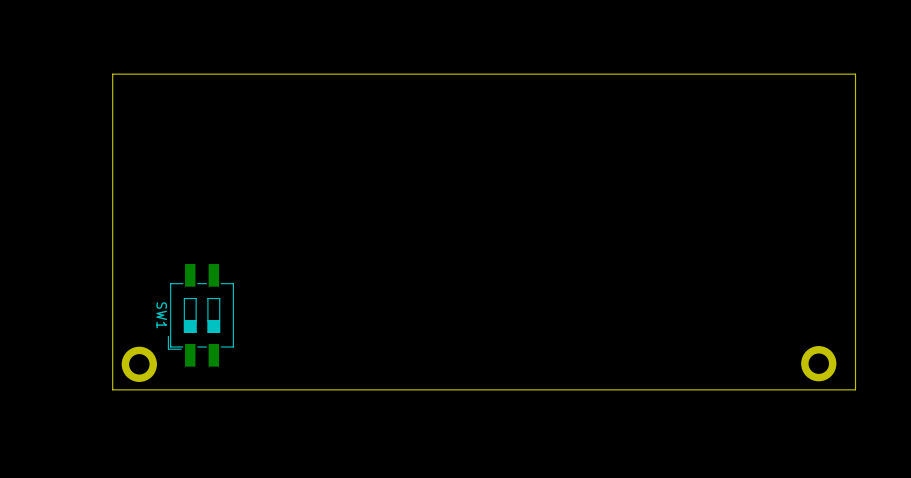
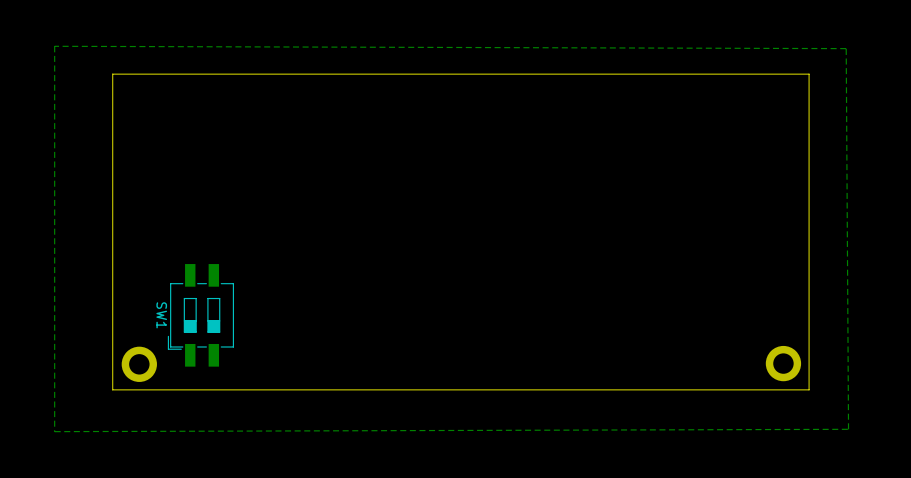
zone outline: none -> (54, 46) (846, 48) (848, 429) (54, 431) (54, 46)
board edge: (809, 74) (855, 74) (855, 389) (809, 389) -> (809, 74) (809, 389)
part position: (818, 363) -> (783, 363)

